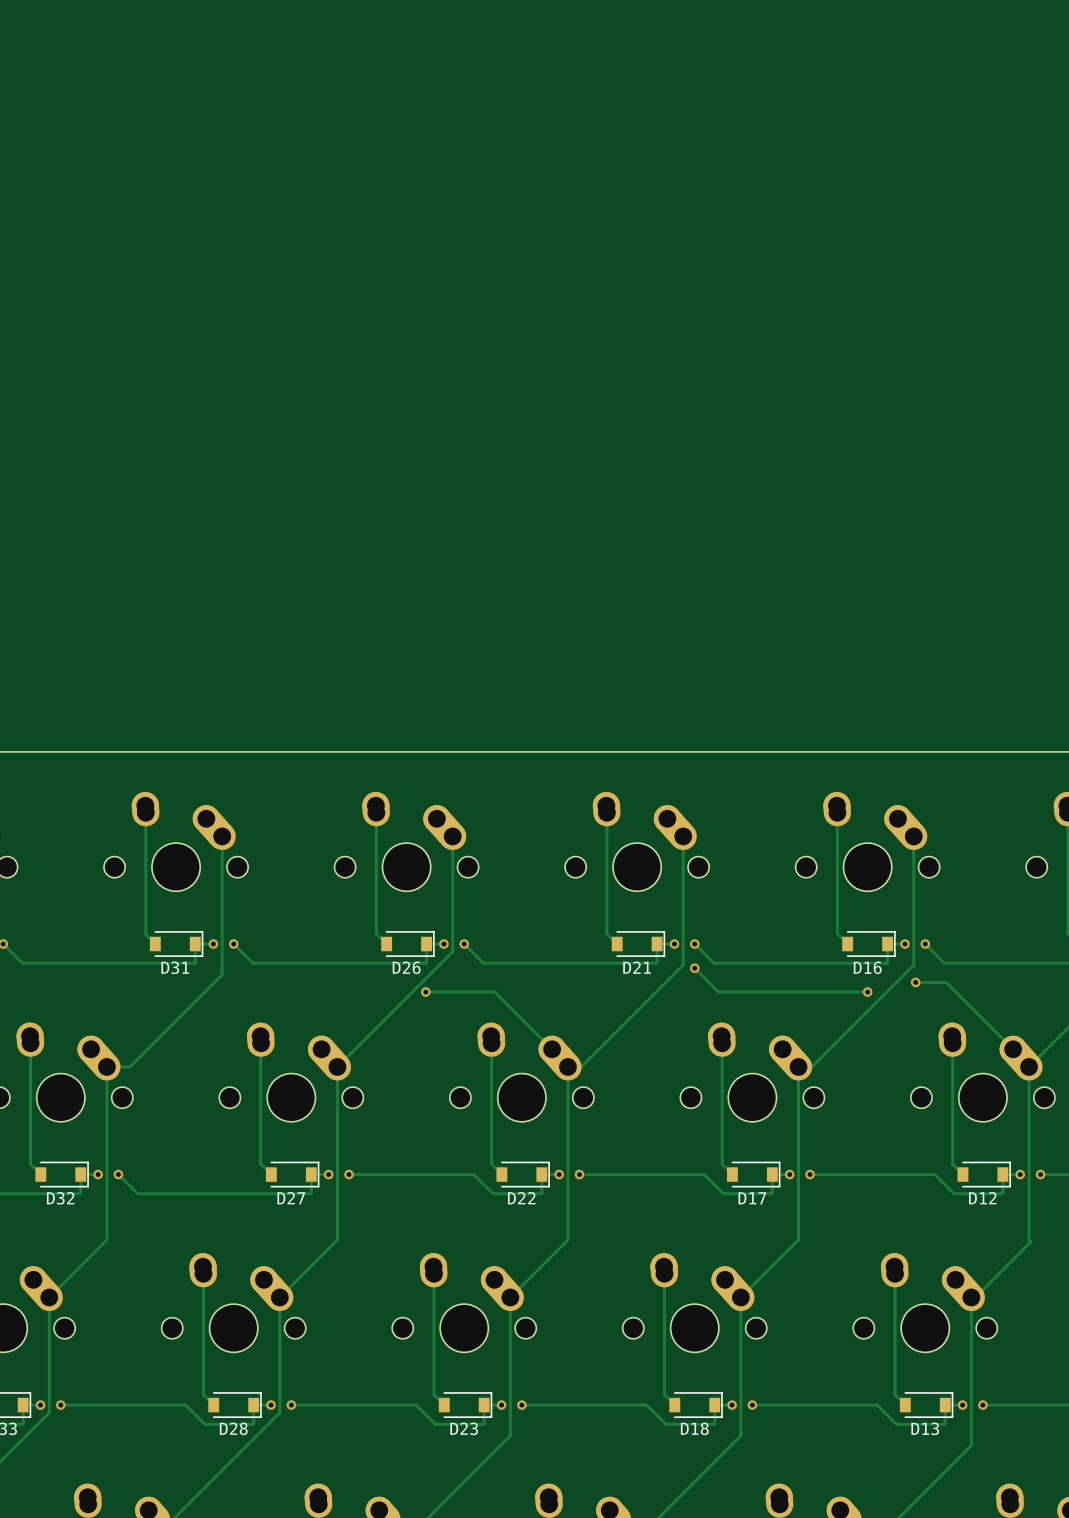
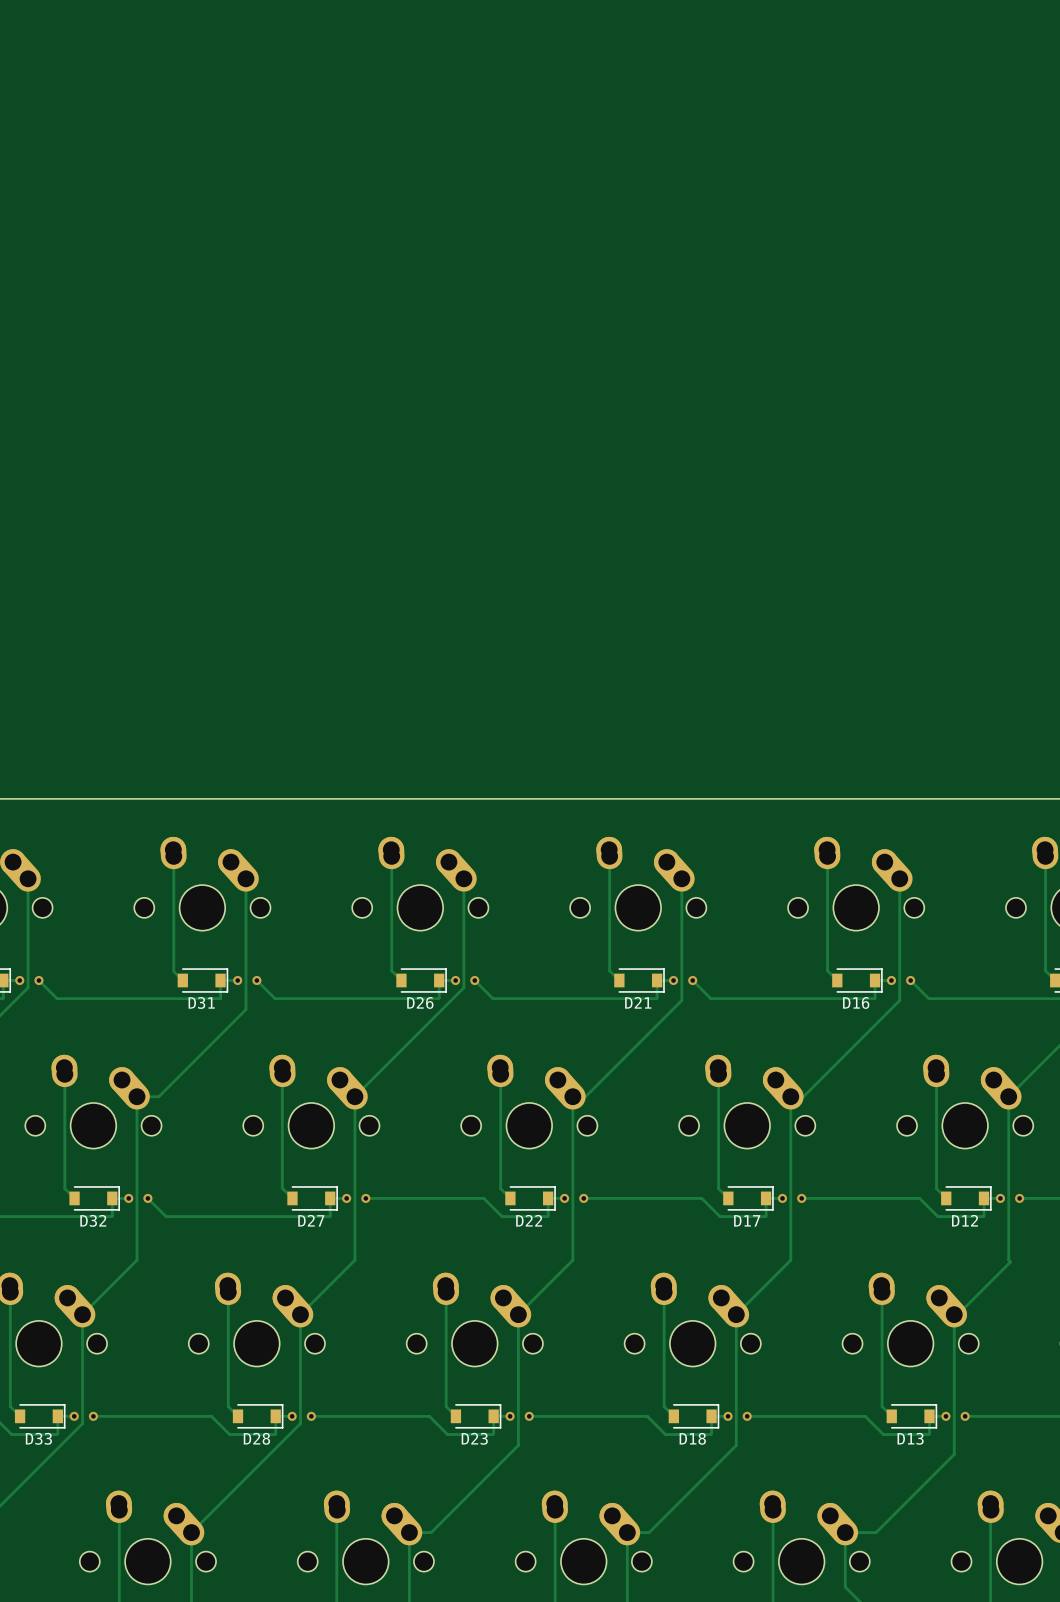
track: (694, 968) (718, 992) (867, 992) -> none
via: (694, 968) -> none
track: (915, 982) (946, 982) (1013, 1049) -> none
via: (915, 982) -> none
track: (425, 992) (494, 992) (552, 1049) -> none
via: (425, 992) -> none
via: (867, 992) -> none

